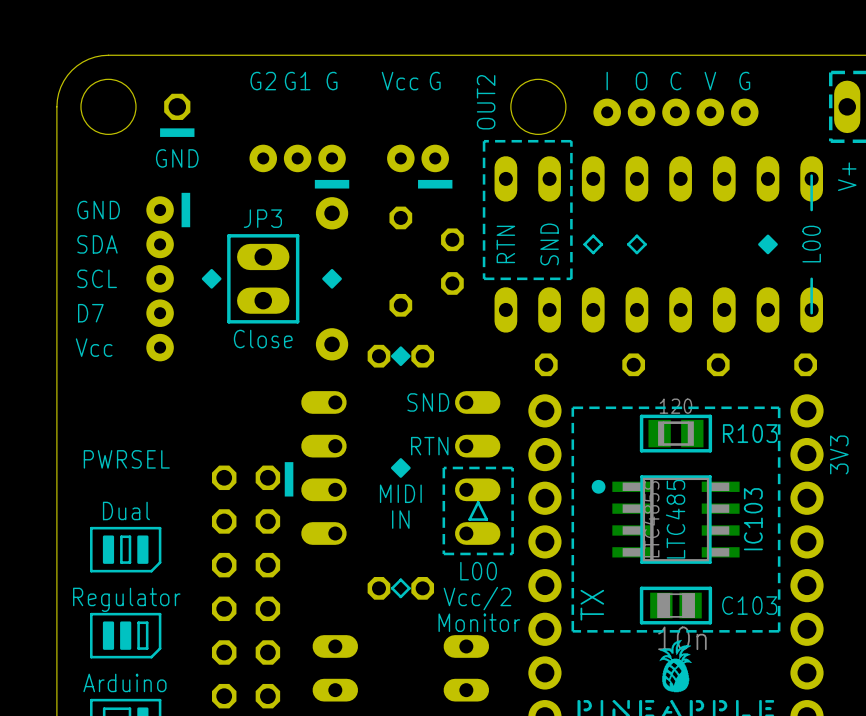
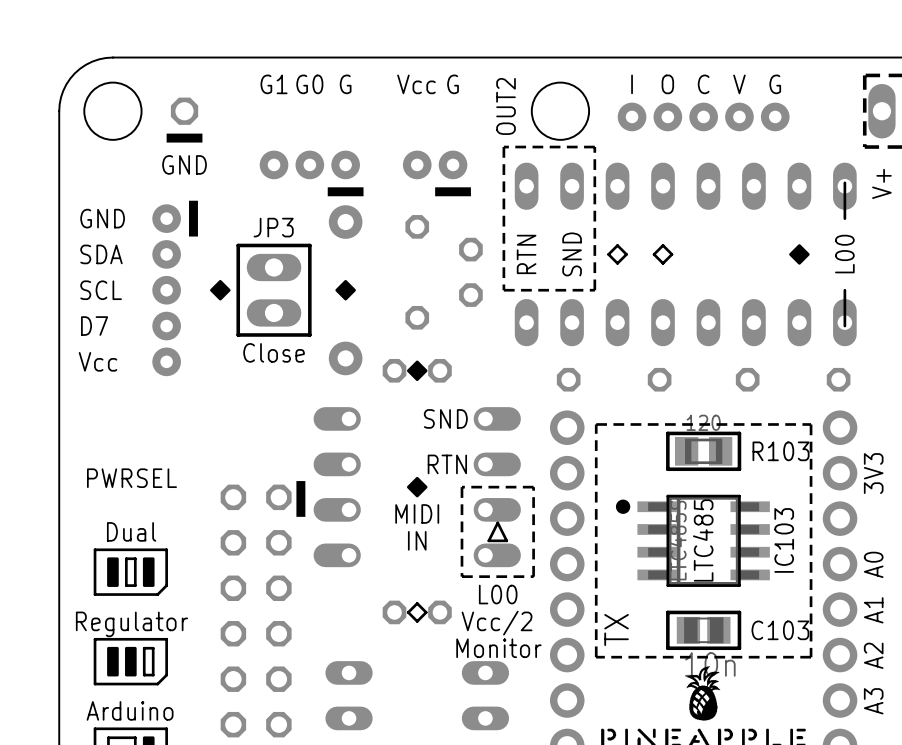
text: G2 (263, 81) -> G1 (274, 84)
text: G1 (297, 81) -> G0 (309, 84)
text: none -> A0 (873, 564)
text: none -> A1 (873, 610)
text: none -> A2 (873, 655)
text: none -> A3 (873, 701)

